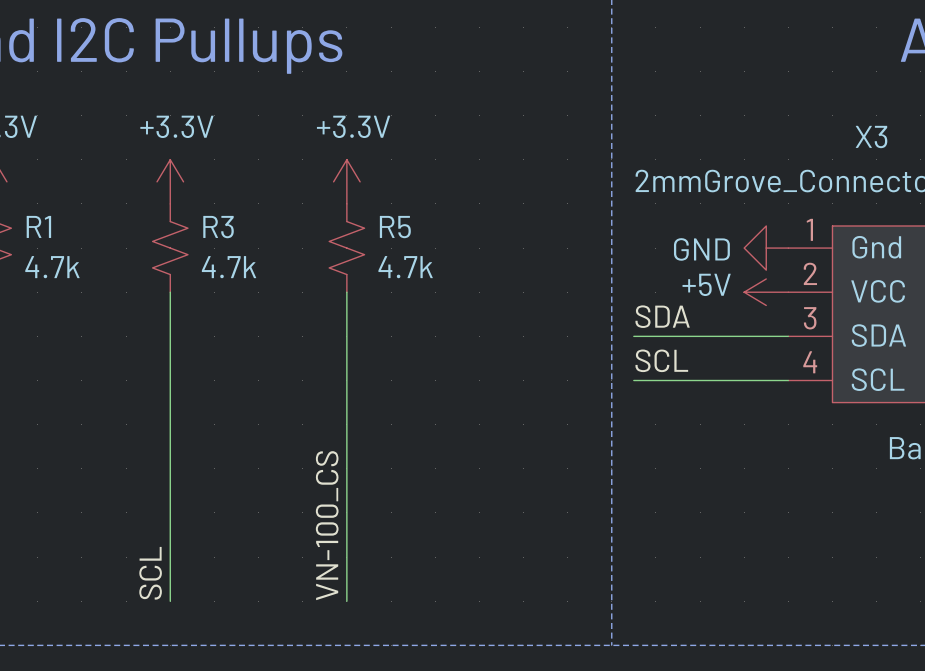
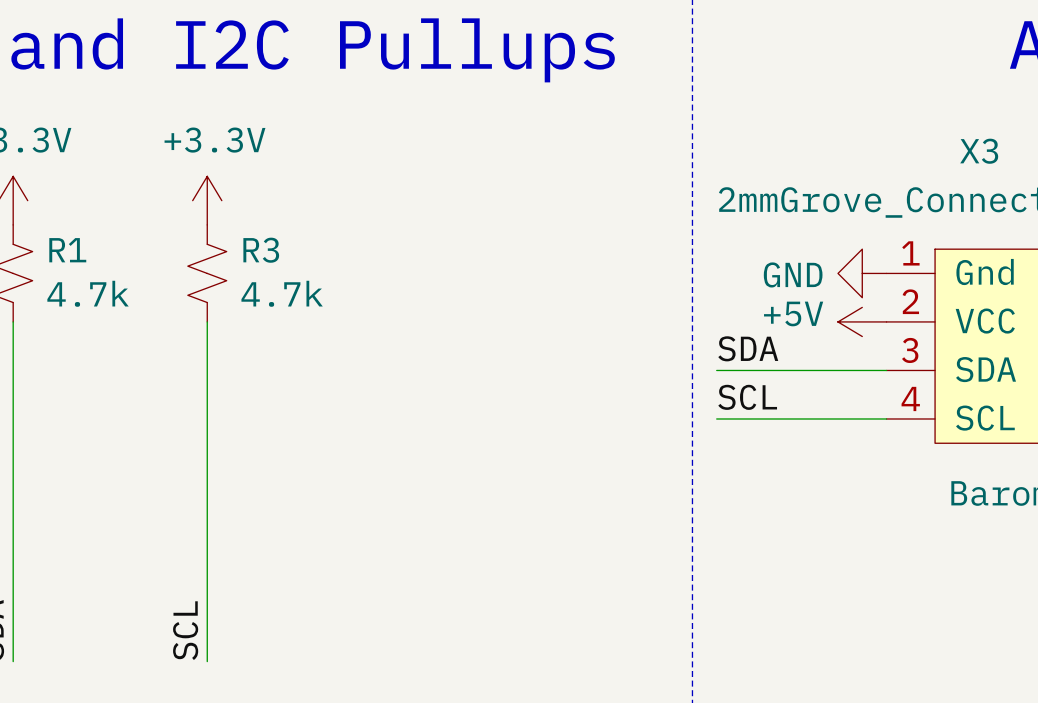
power symbol: +3.3V (346, 181) -> none
R5: 4.7k (346, 248) -> none
wire: (346, 292) (346, 601) -> none
label: VN-100_CS (327, 525) -> none

